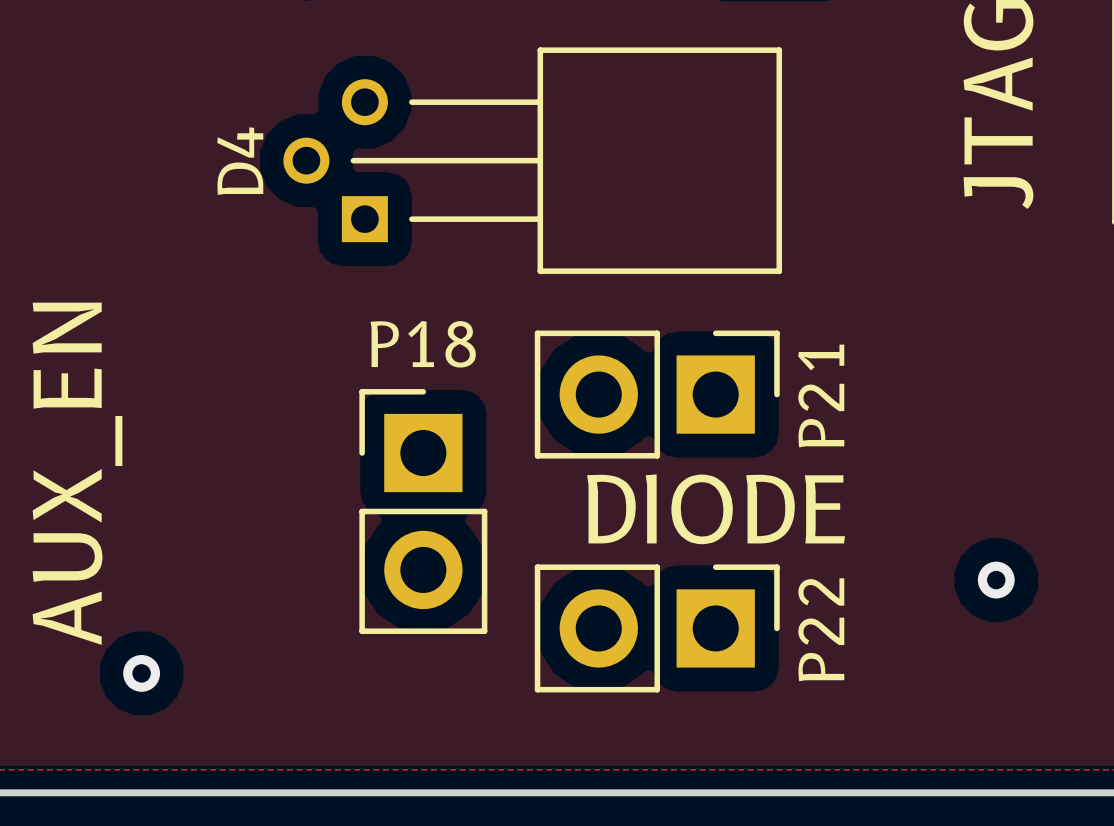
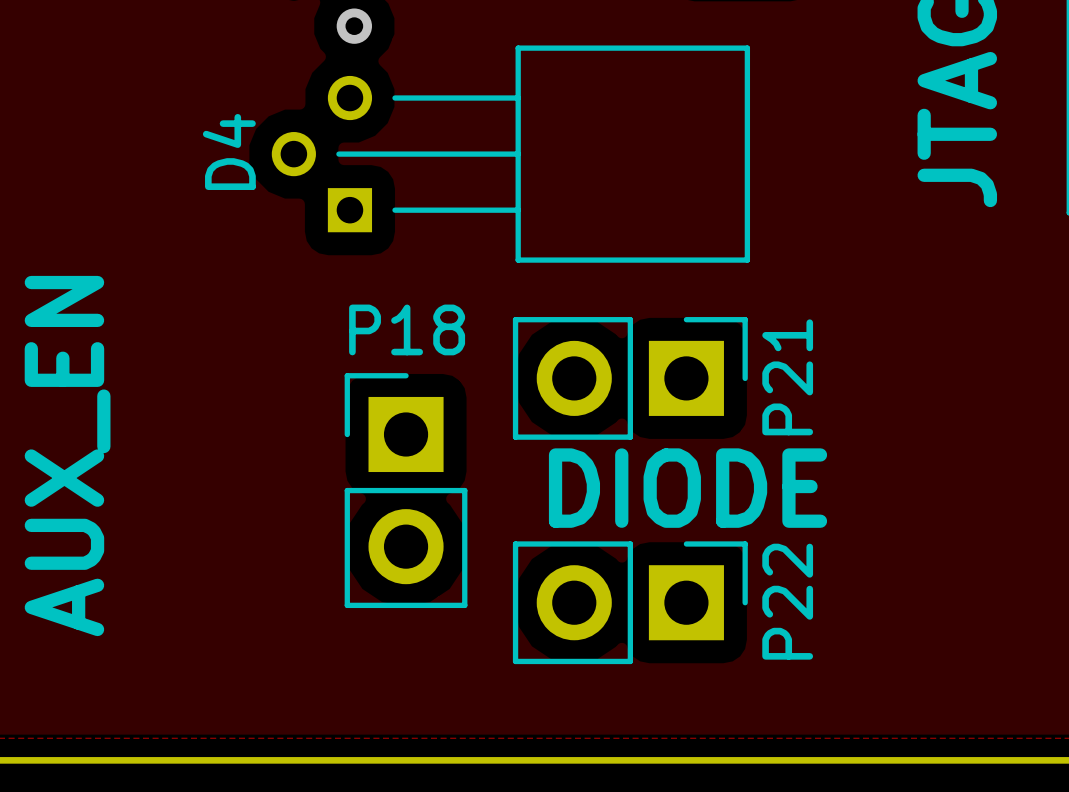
via: none -> (354, 26)
via: (996, 580) -> none
via: (141, 673) -> none

